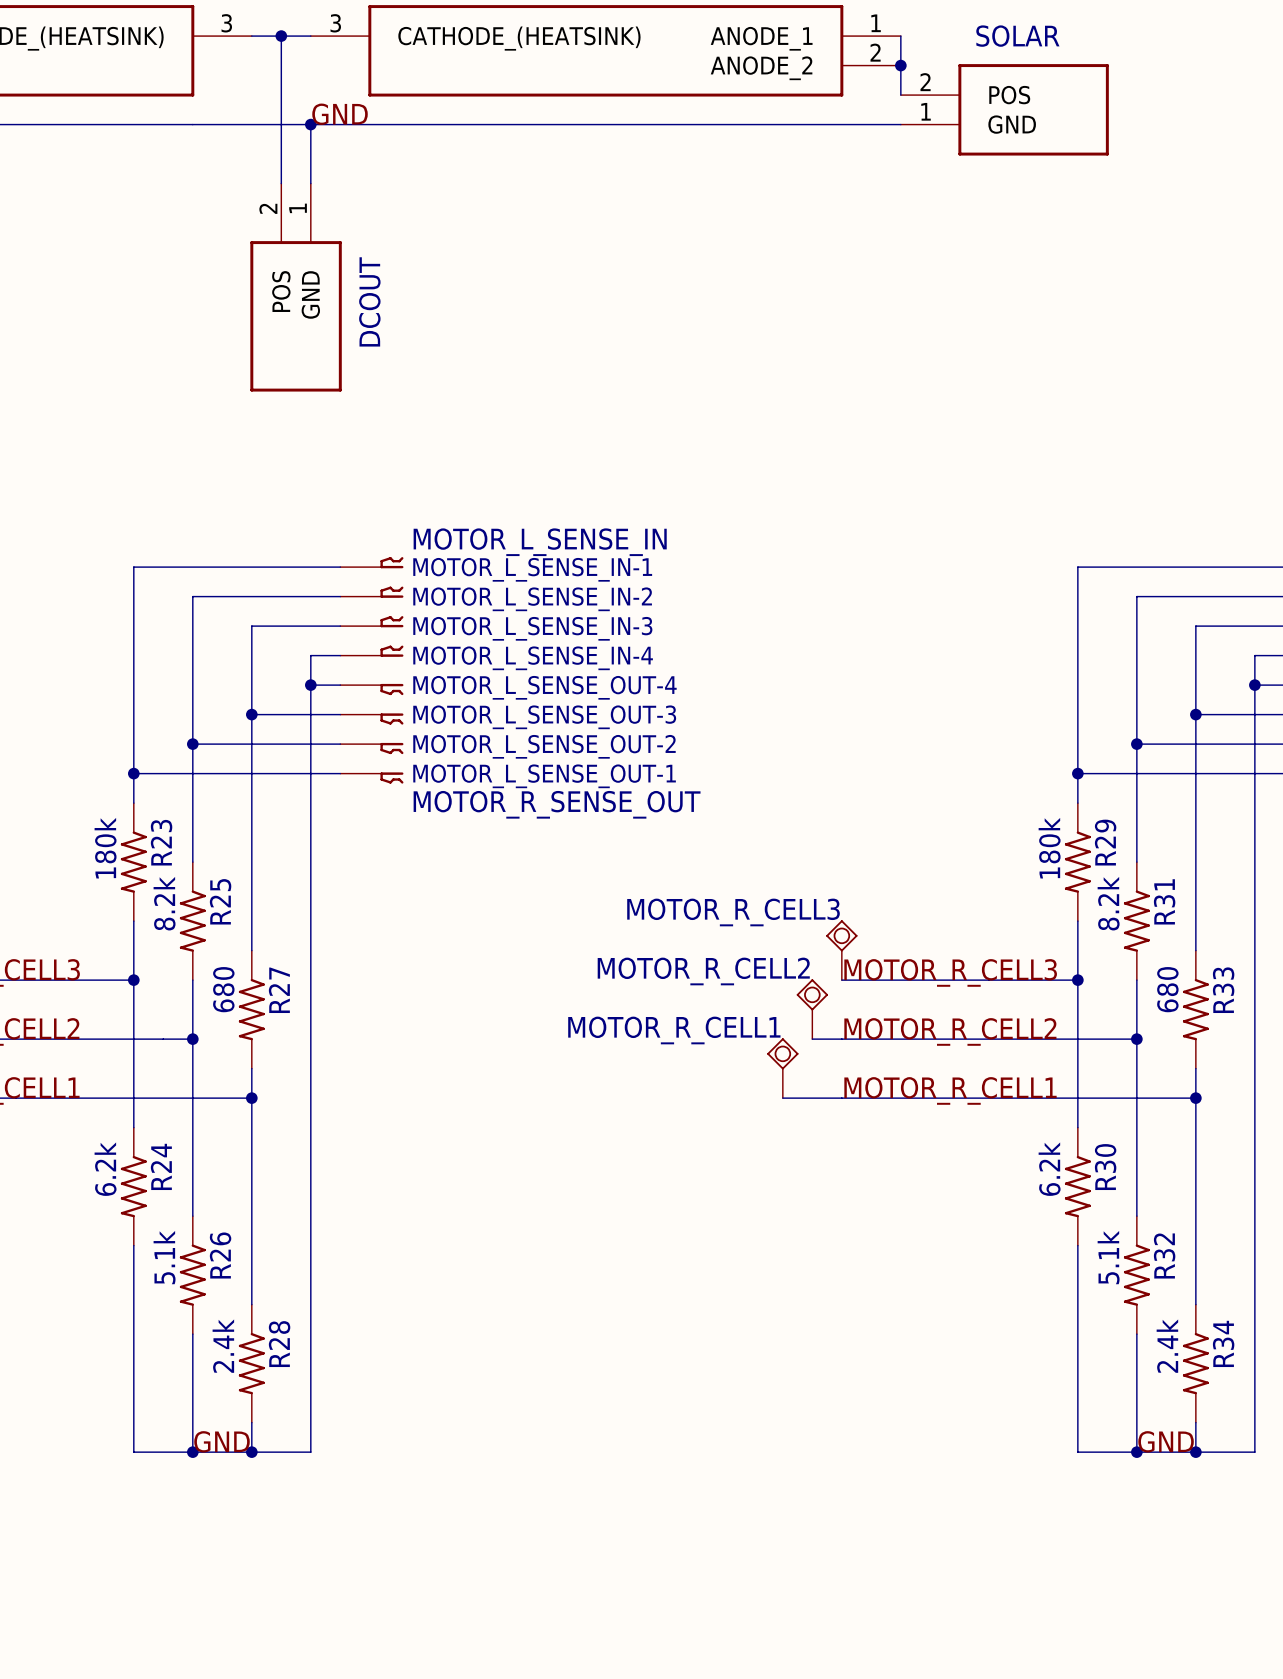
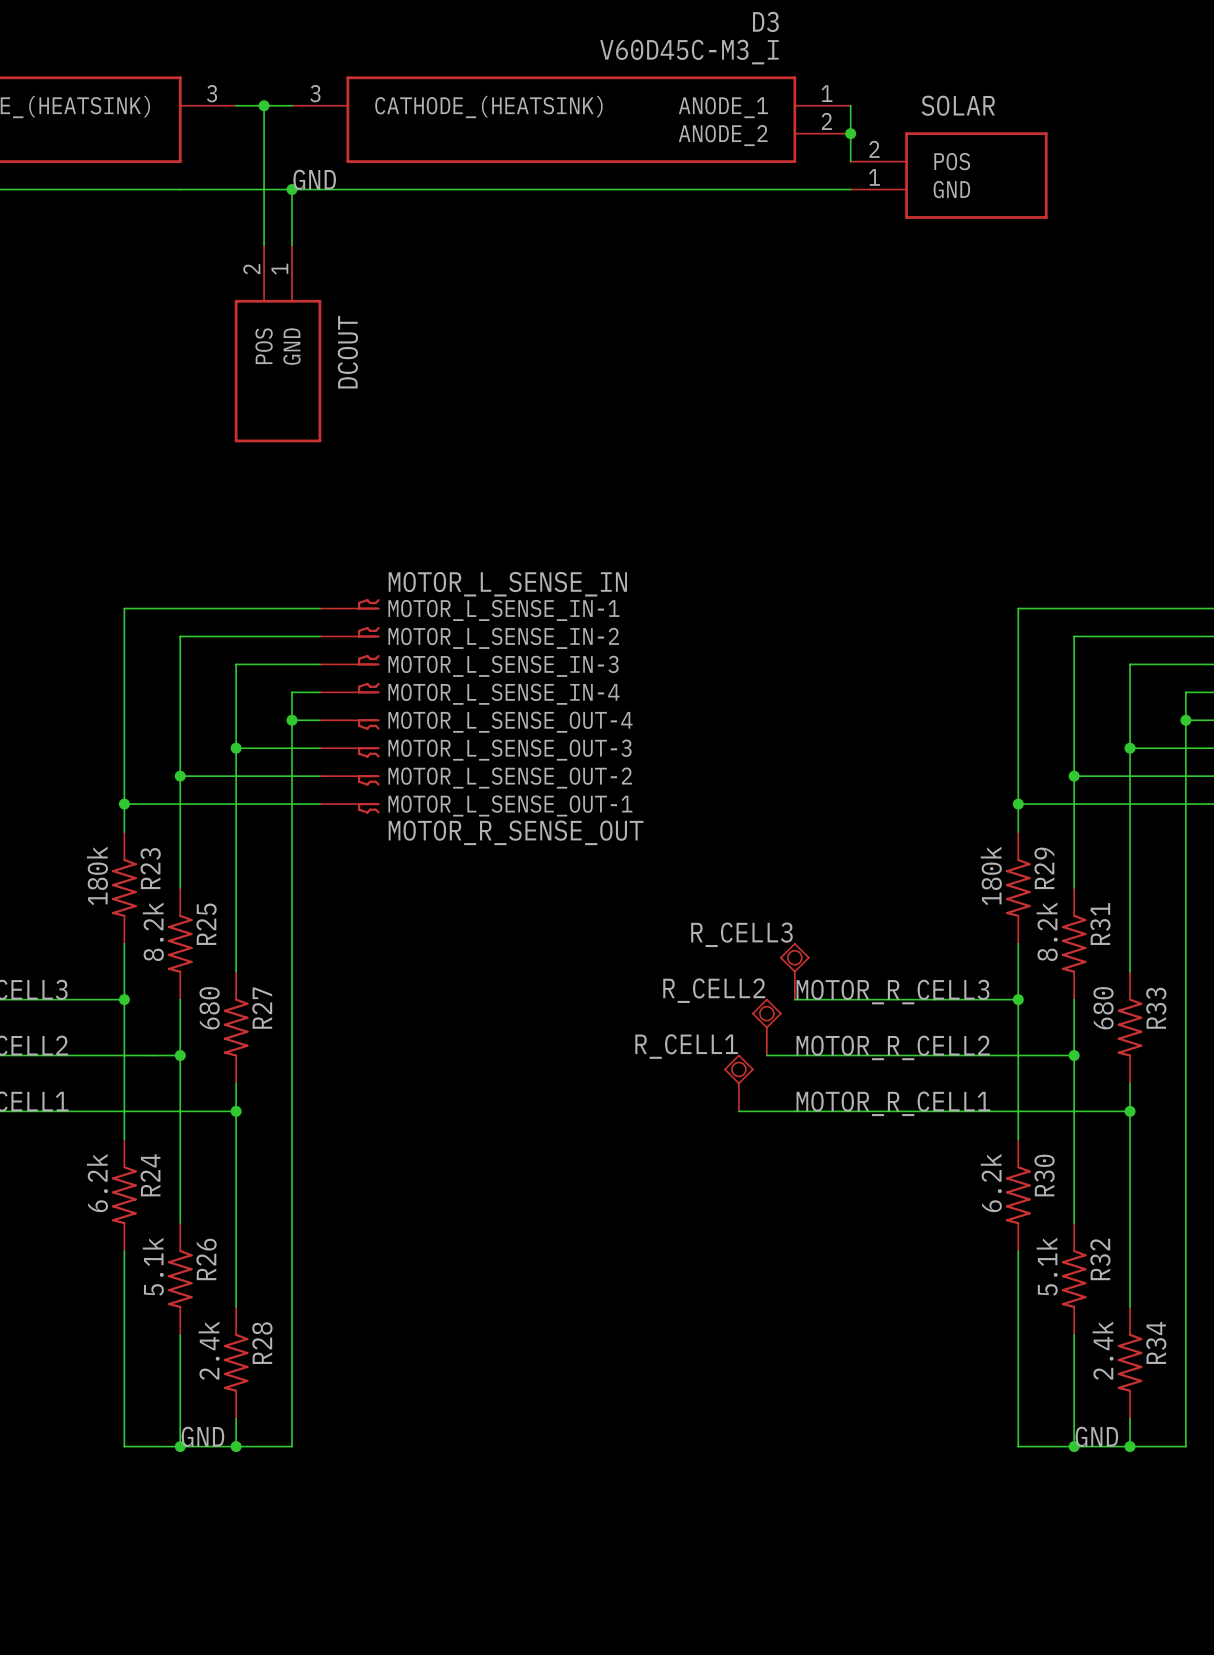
MOTOR_R_CELL3 name: MOTOR_R_CELL3 (733, 912) -> R_CELL3 (741, 934)
MOTOR_R_CELL2 name: MOTOR_R_CELL2 (703, 971) -> R_CELL2 (714, 990)
MOTOR_R_CELL1 name: MOTOR_R_CELL1 (674, 1030) -> R_CELL1 (686, 1046)

